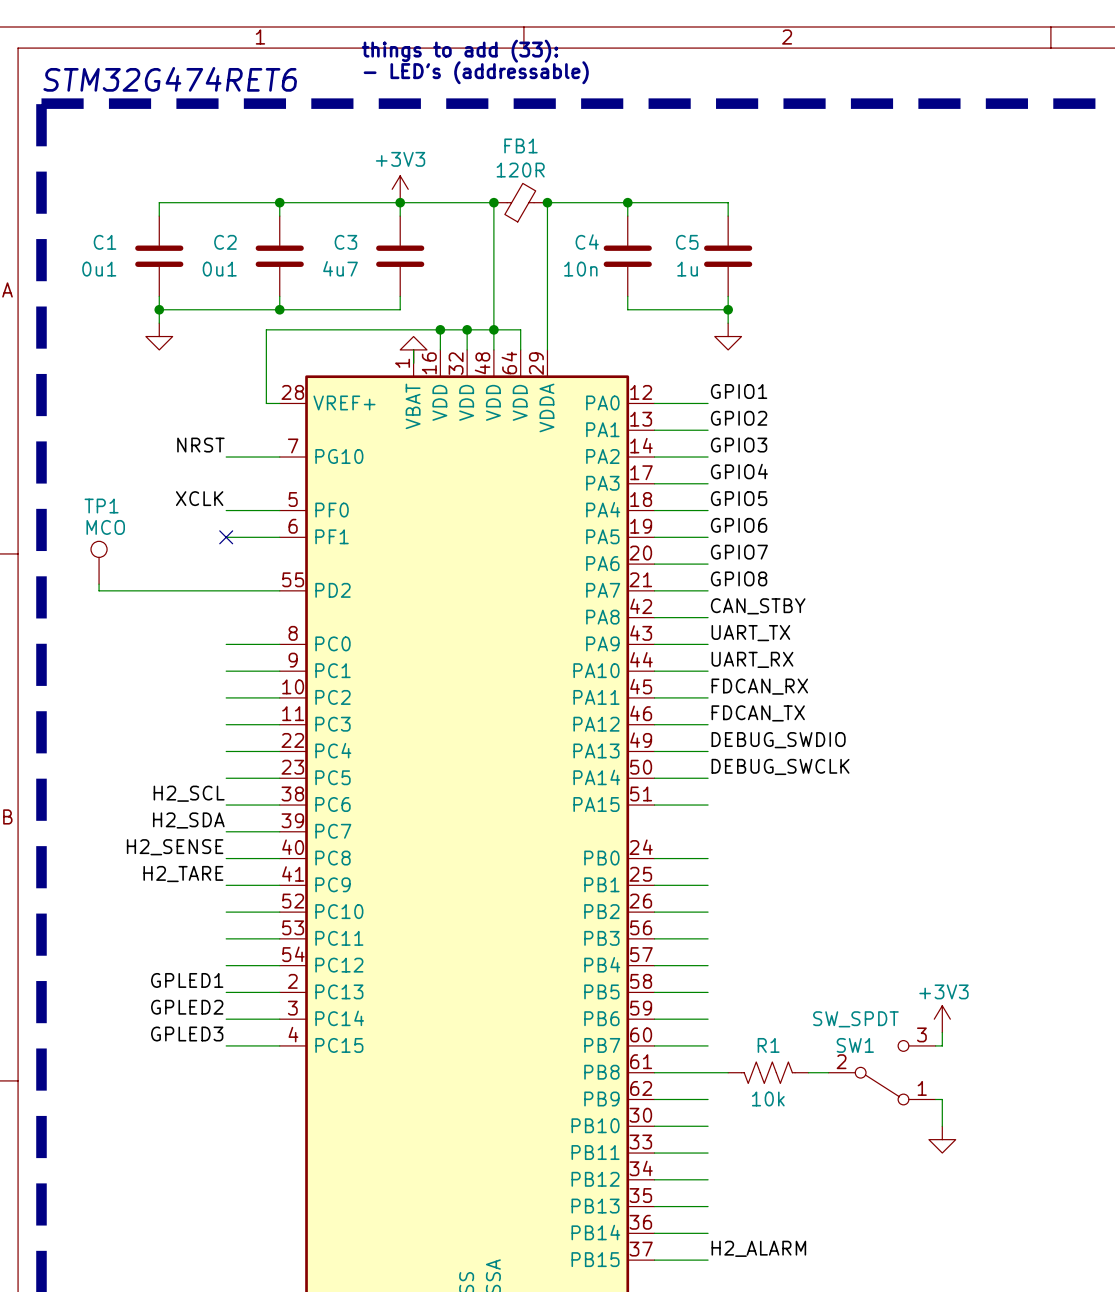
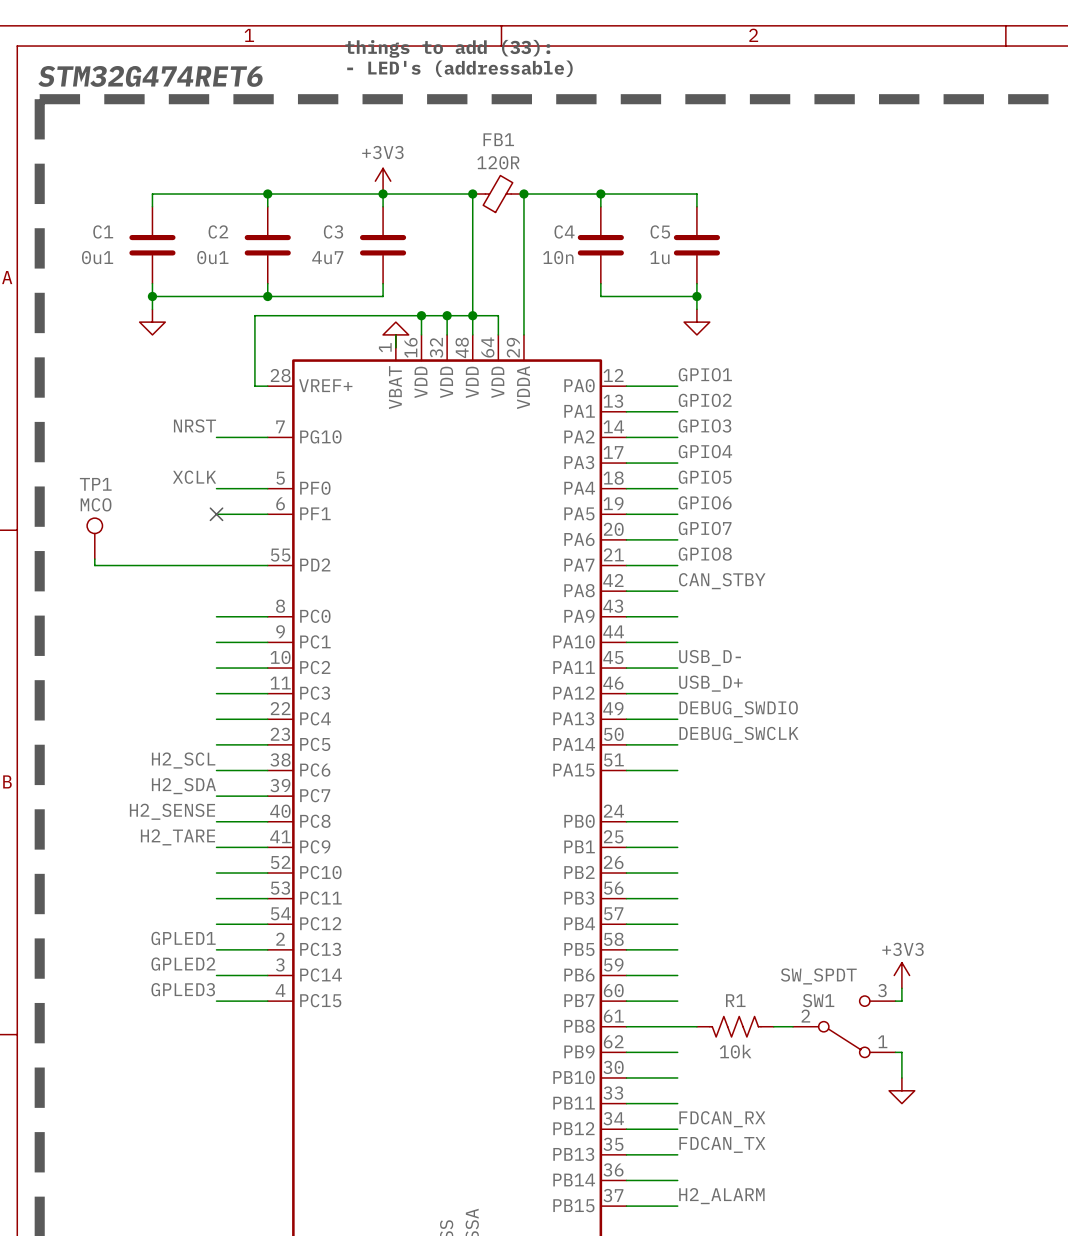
label: UART_TX (750, 633) -> none
label: UART_RX (752, 659) -> none
label: FDCAN_RX (759, 686) -> USB_D- (710, 658)
label: FDCAN_TX (758, 713) -> USB_D+ (710, 683)
label: none -> FDCAN_RX (722, 1119)
label: none -> FDCAN_TX (722, 1144)

